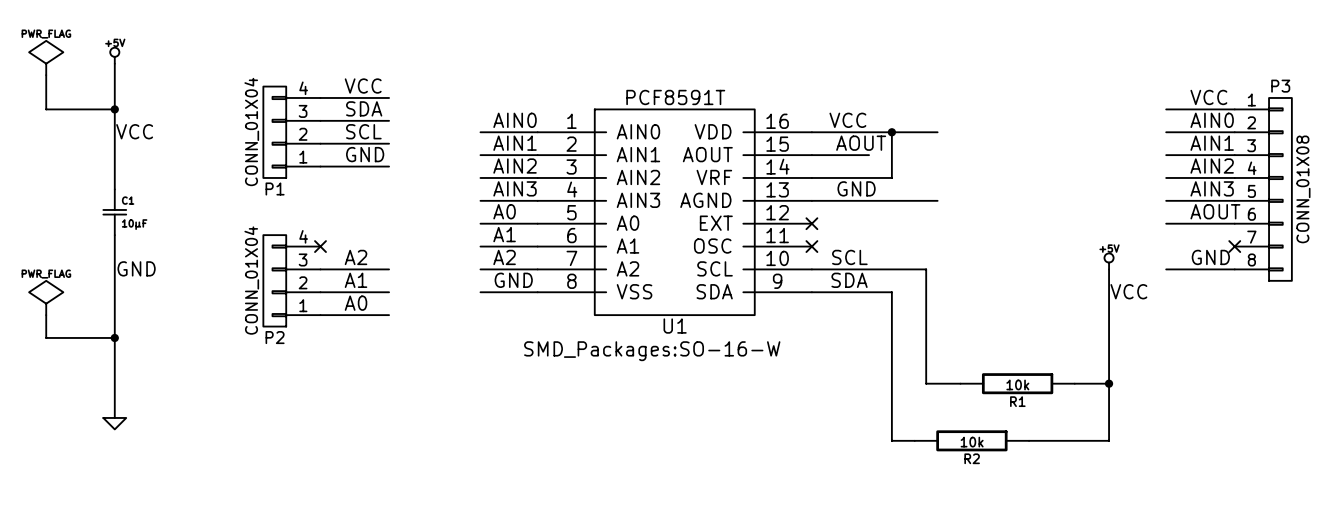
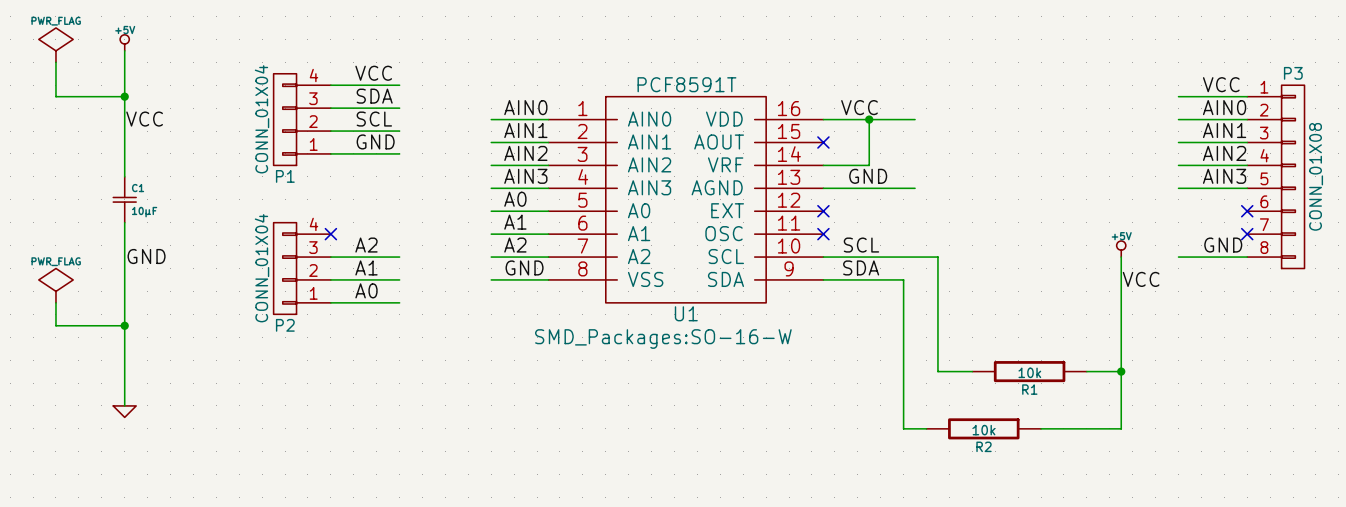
wire: (891, 132) (891, 177) (857, 177) -> (869, 119) (869, 165)
junction position: (891, 132) -> (869, 119)
wire: (903, 132) (937, 132) -> none
label: AOUT (861, 143) -> none
wire: (811, 155) (869, 155) -> none
no-connect mark: none -> (823, 142)
wire: (903, 200) (937, 200) -> none
label: AOUT (1215, 211) -> none
wire: (1166, 223) (1234, 223) -> none
no-connect mark: none -> (1247, 211)

